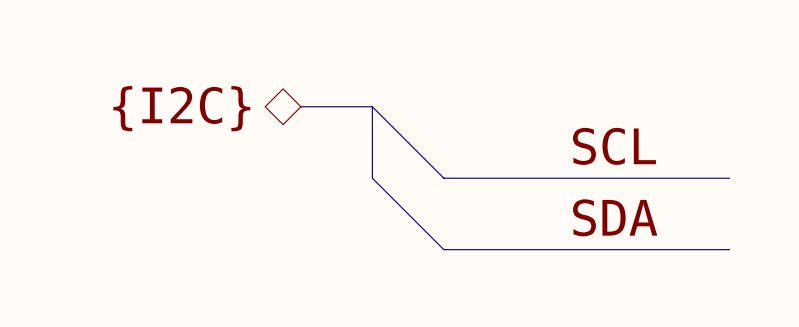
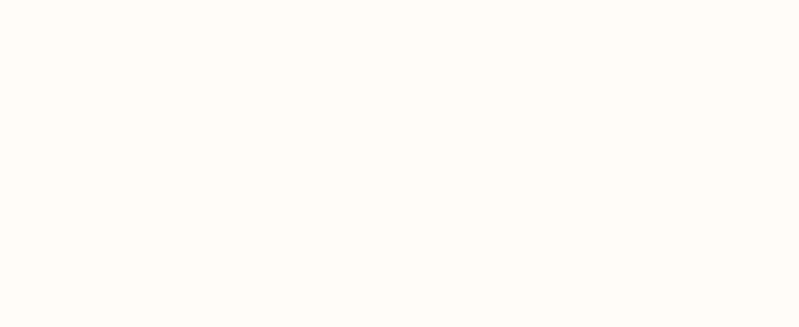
bus: (300, 106) (372, 106) (372, 178) -> none
wire: (372, 106) (443, 178) (729, 178) -> none
hierarchical label: {I2C} (181, 108) -> none
label: SCL (614, 146) -> none
wire: (372, 178) (443, 249) (729, 249) -> none
label: SDA (615, 217) -> none

